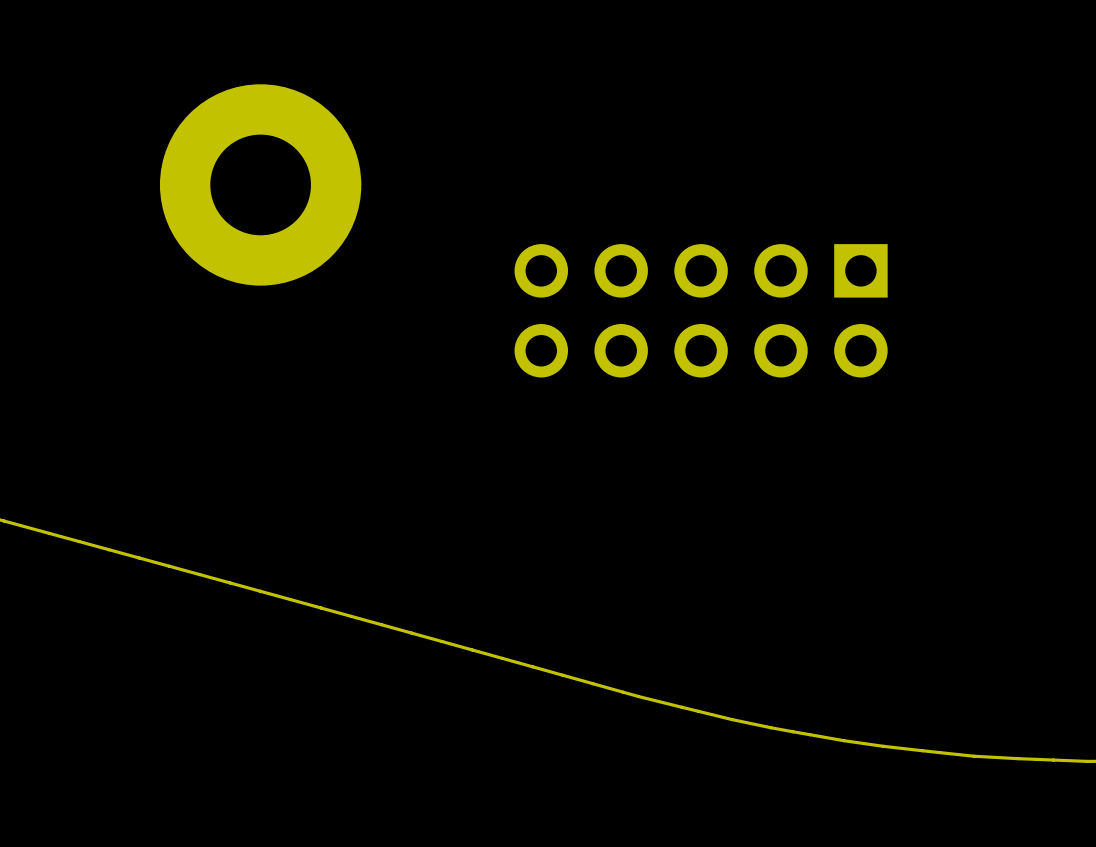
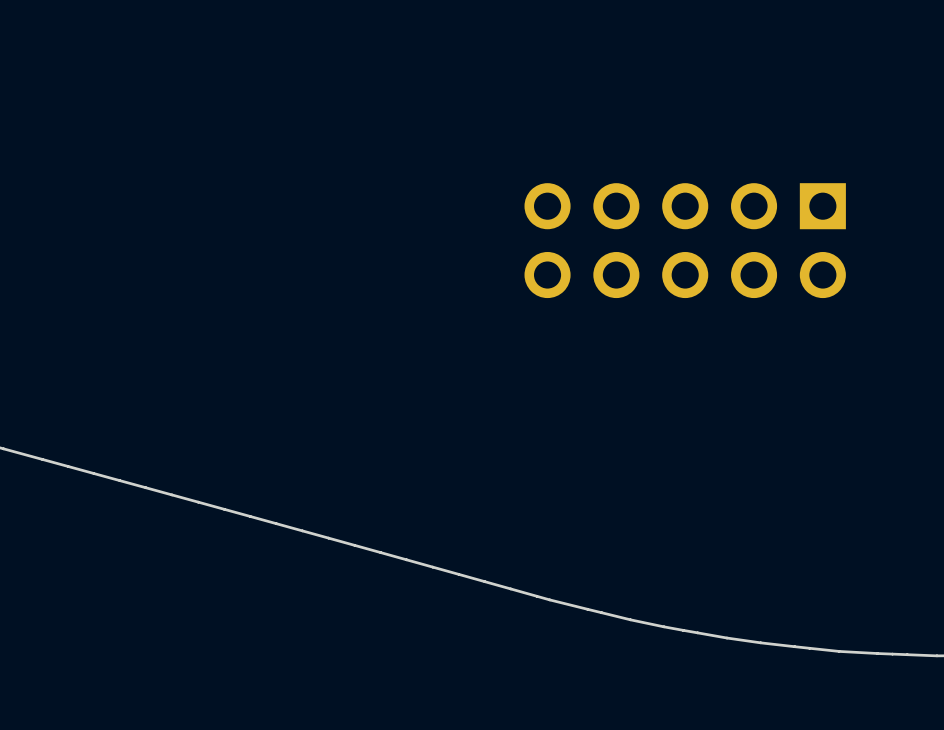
part: (260, 184) -> none
part position: (701, 310) -> (685, 240)

